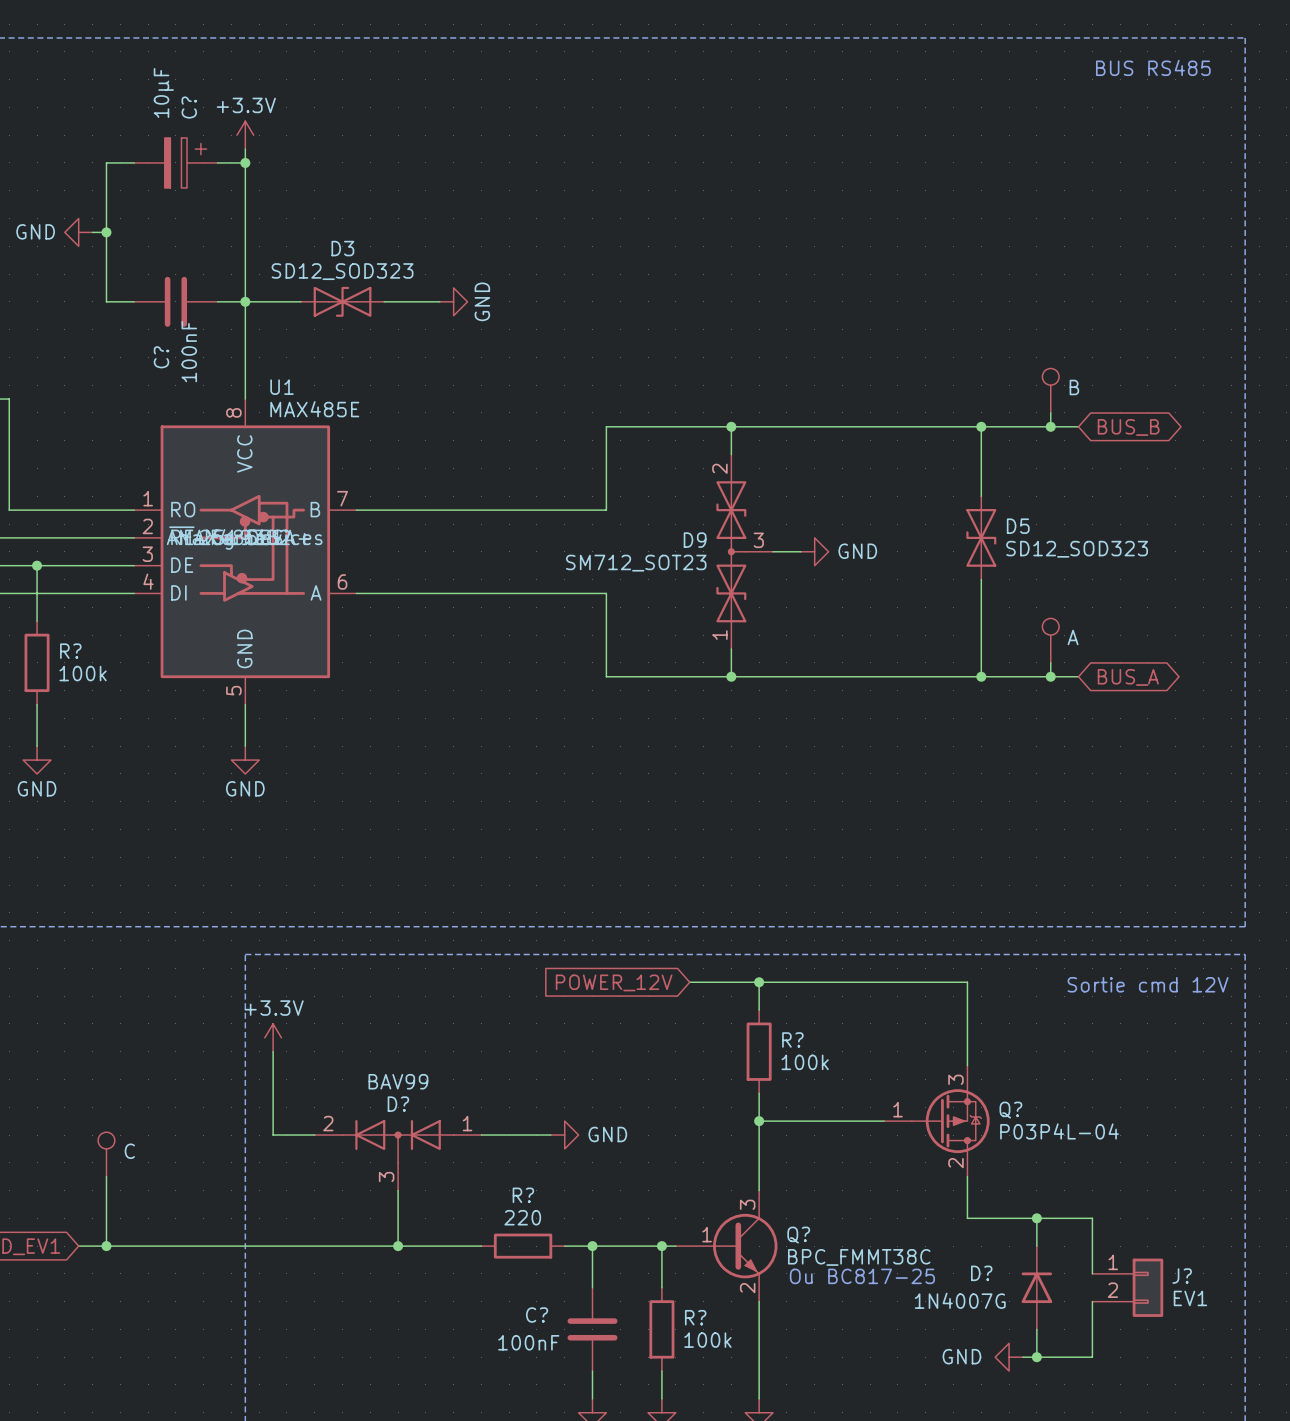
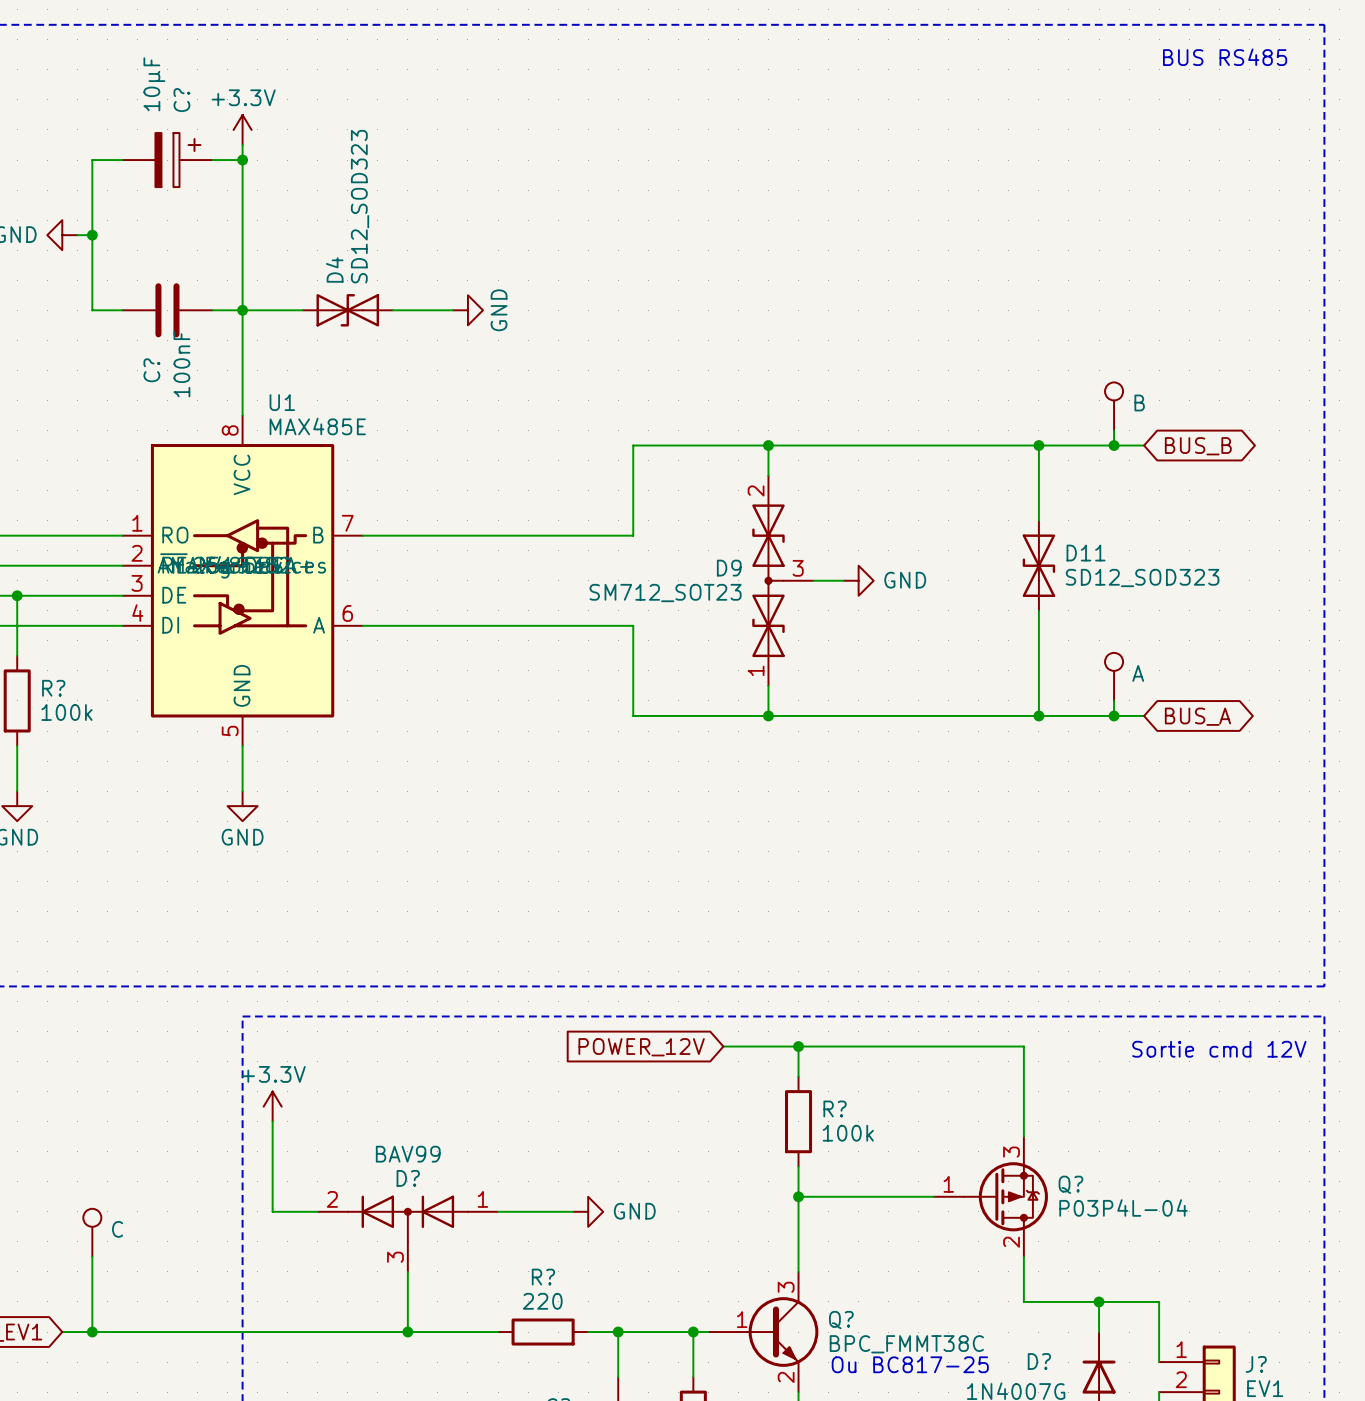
D3 name: D3 (342, 248) -> D4 (334, 269)
D3 value rotation: 0° (342, 271) -> 90° counterclockwise (360, 206)
D5 name: D5 (1018, 526) -> D11 (1086, 553)

